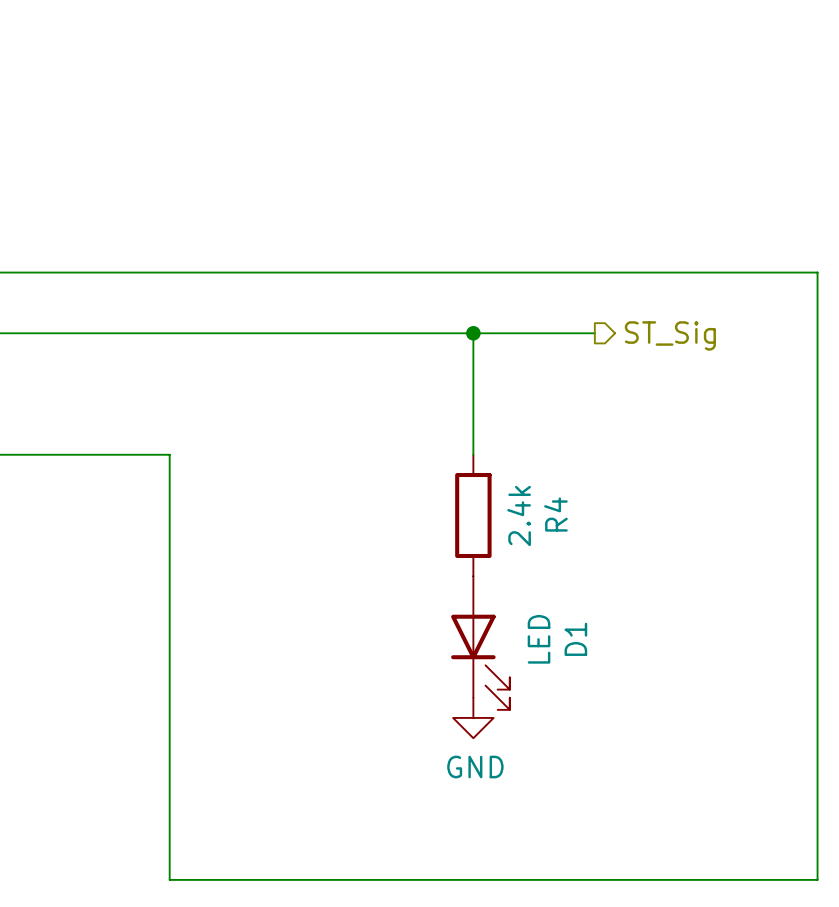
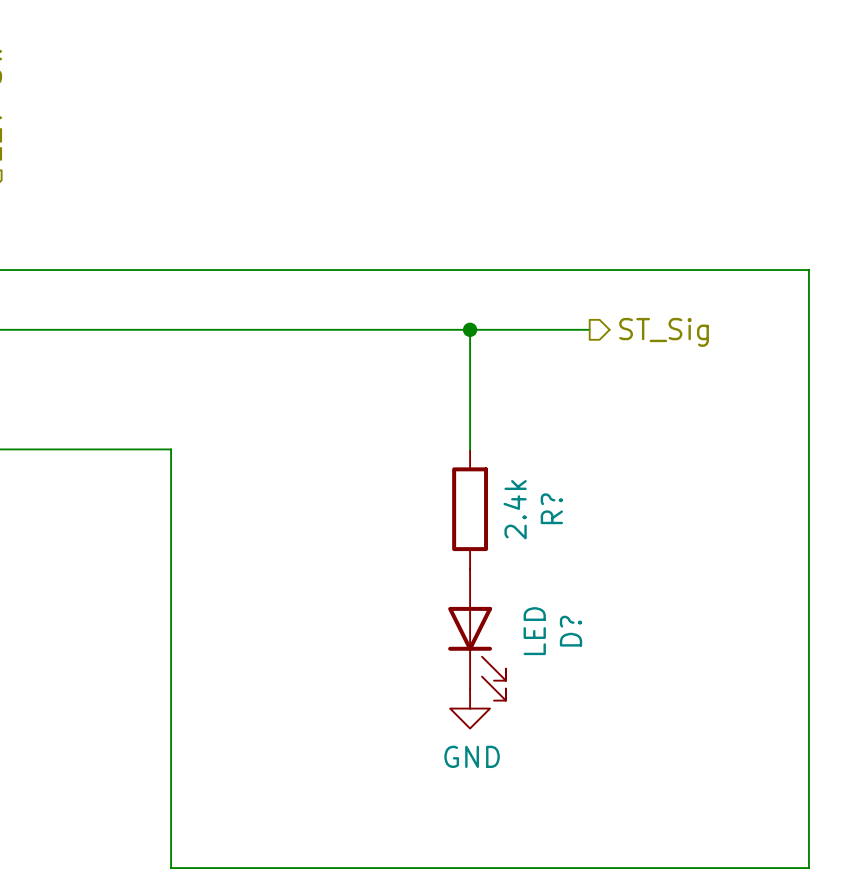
R4 name: R4 (555, 514) -> R? (551, 508)
D1 name: D1 (575, 639) -> D? (571, 631)

